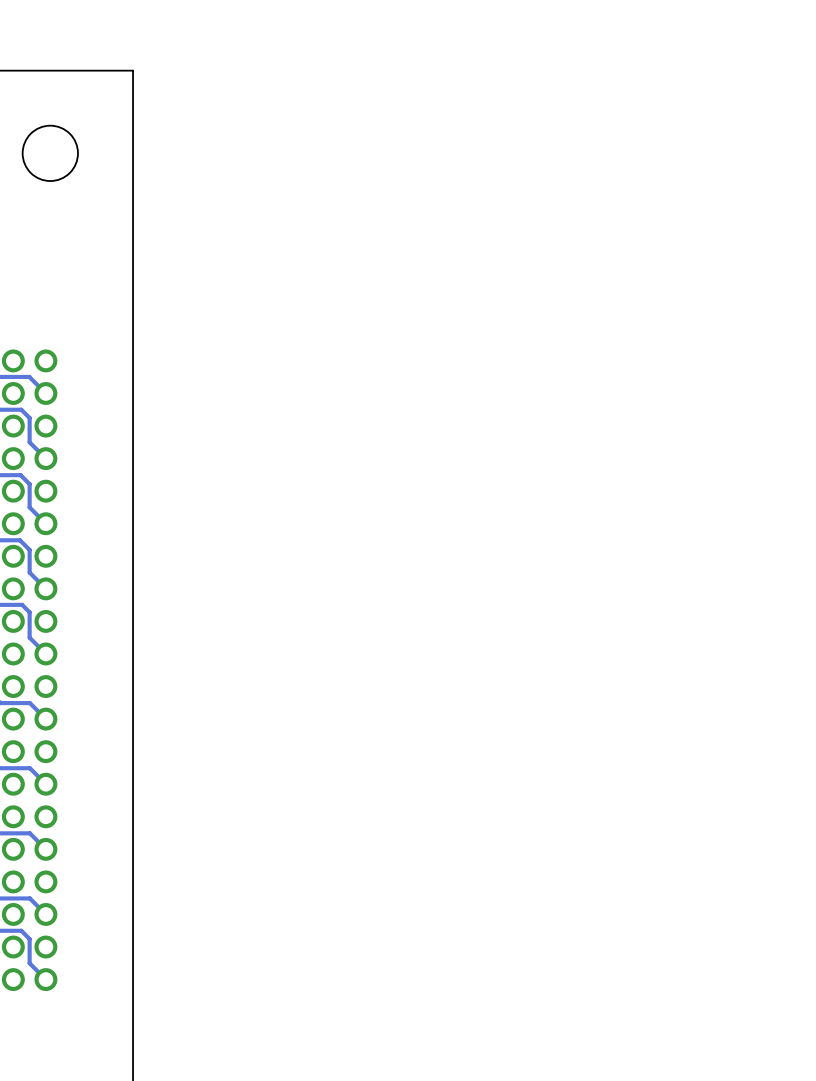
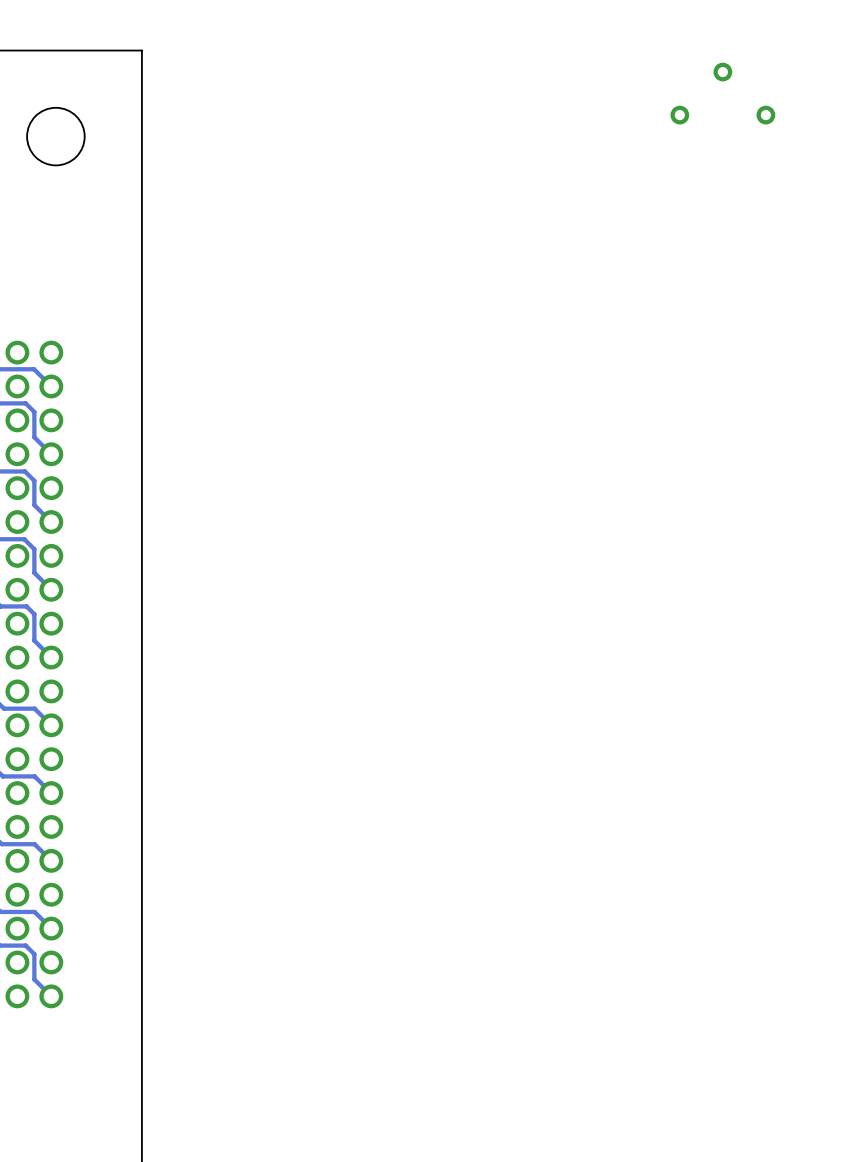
part: none -> (722, 93)

